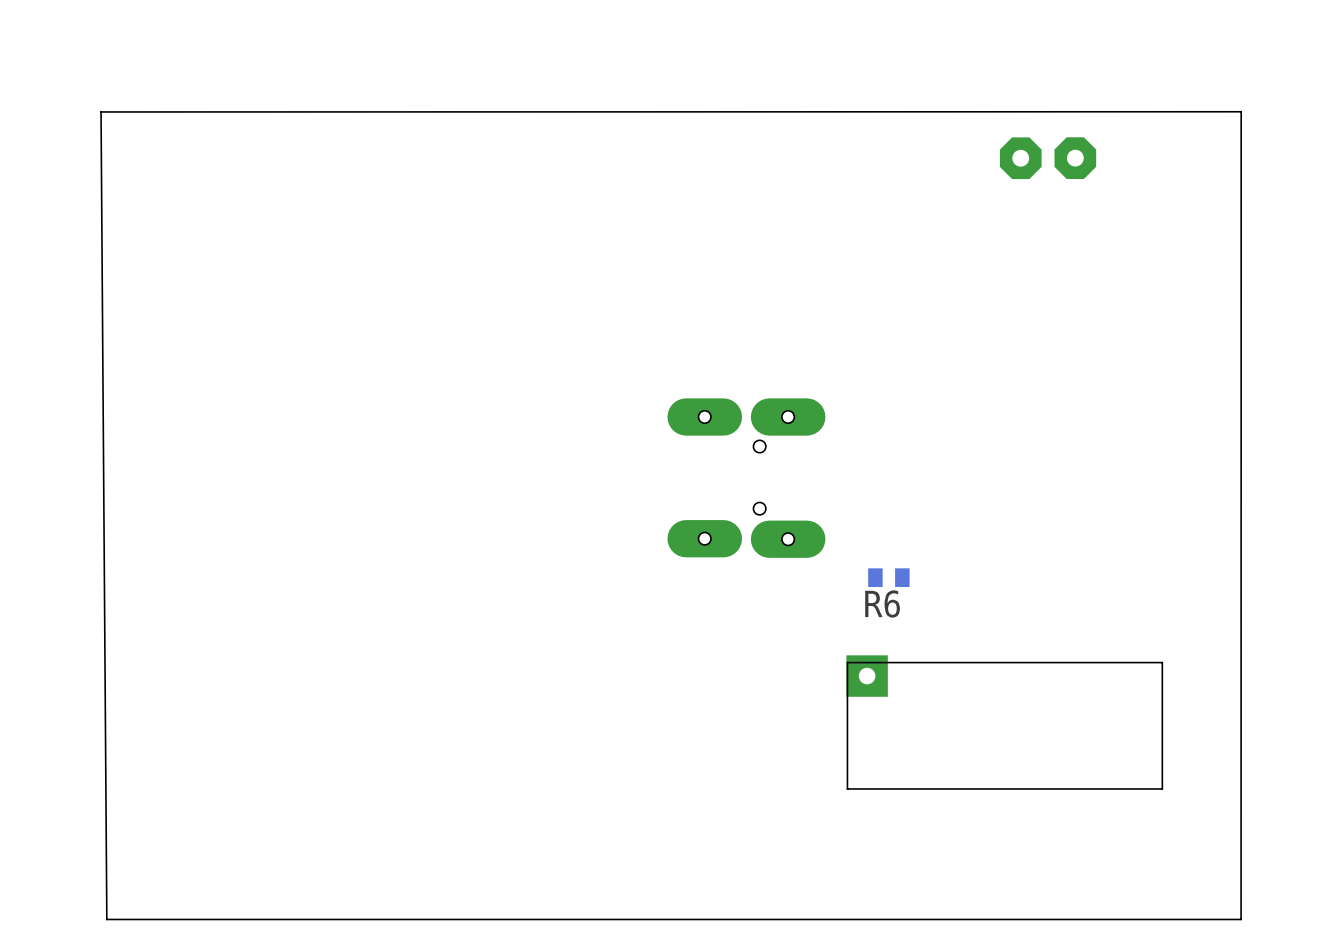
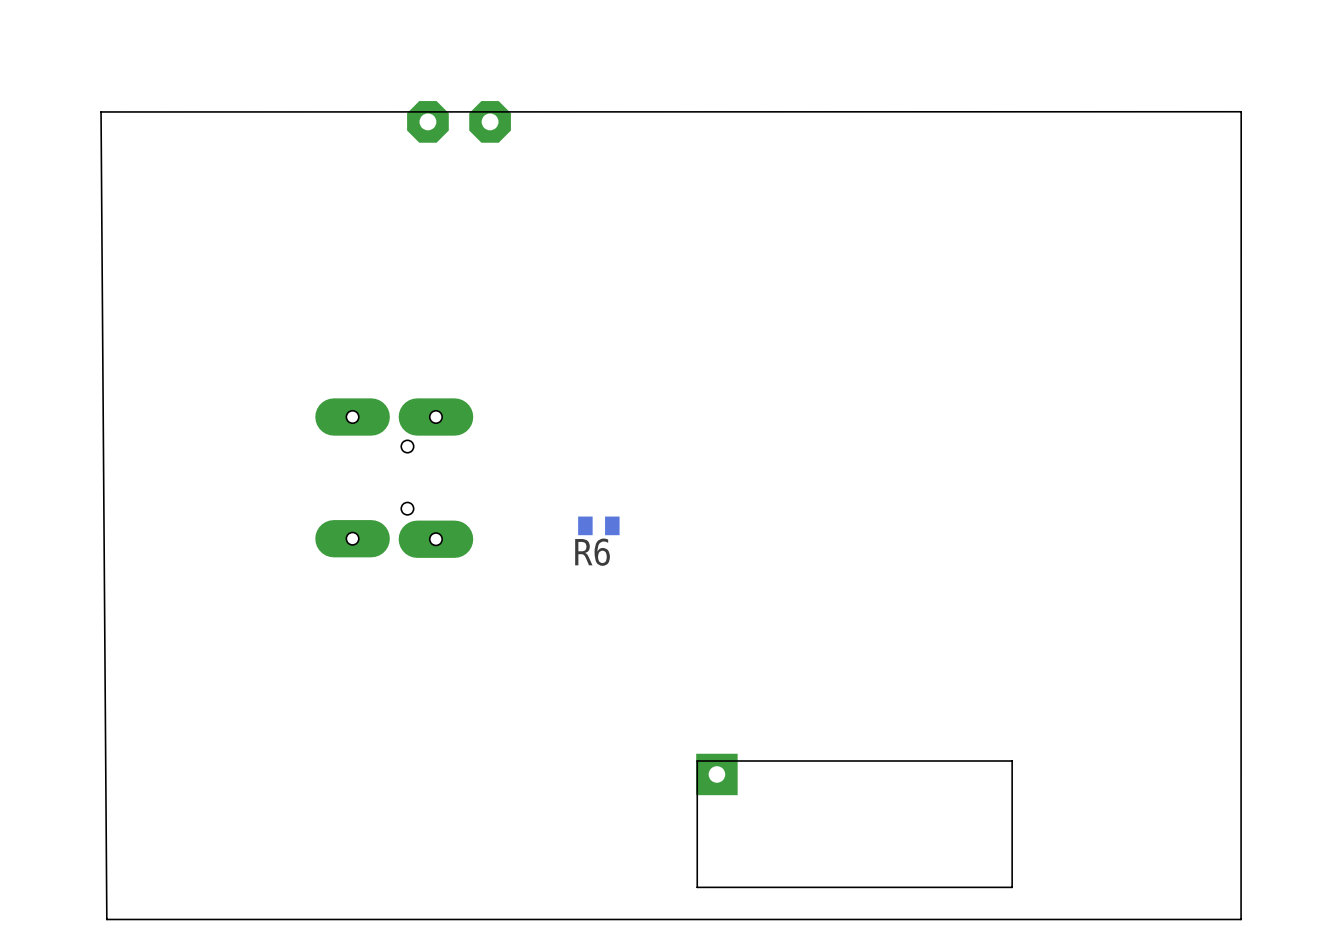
part: none -> (427, 121)
part: none -> (490, 121)
part: (1020, 158) -> none
part: (1075, 158) -> none
part position: (746, 478) -> (394, 478)
R6 position: (888, 577) -> (598, 525)
part position: (1004, 722) -> (854, 820)

